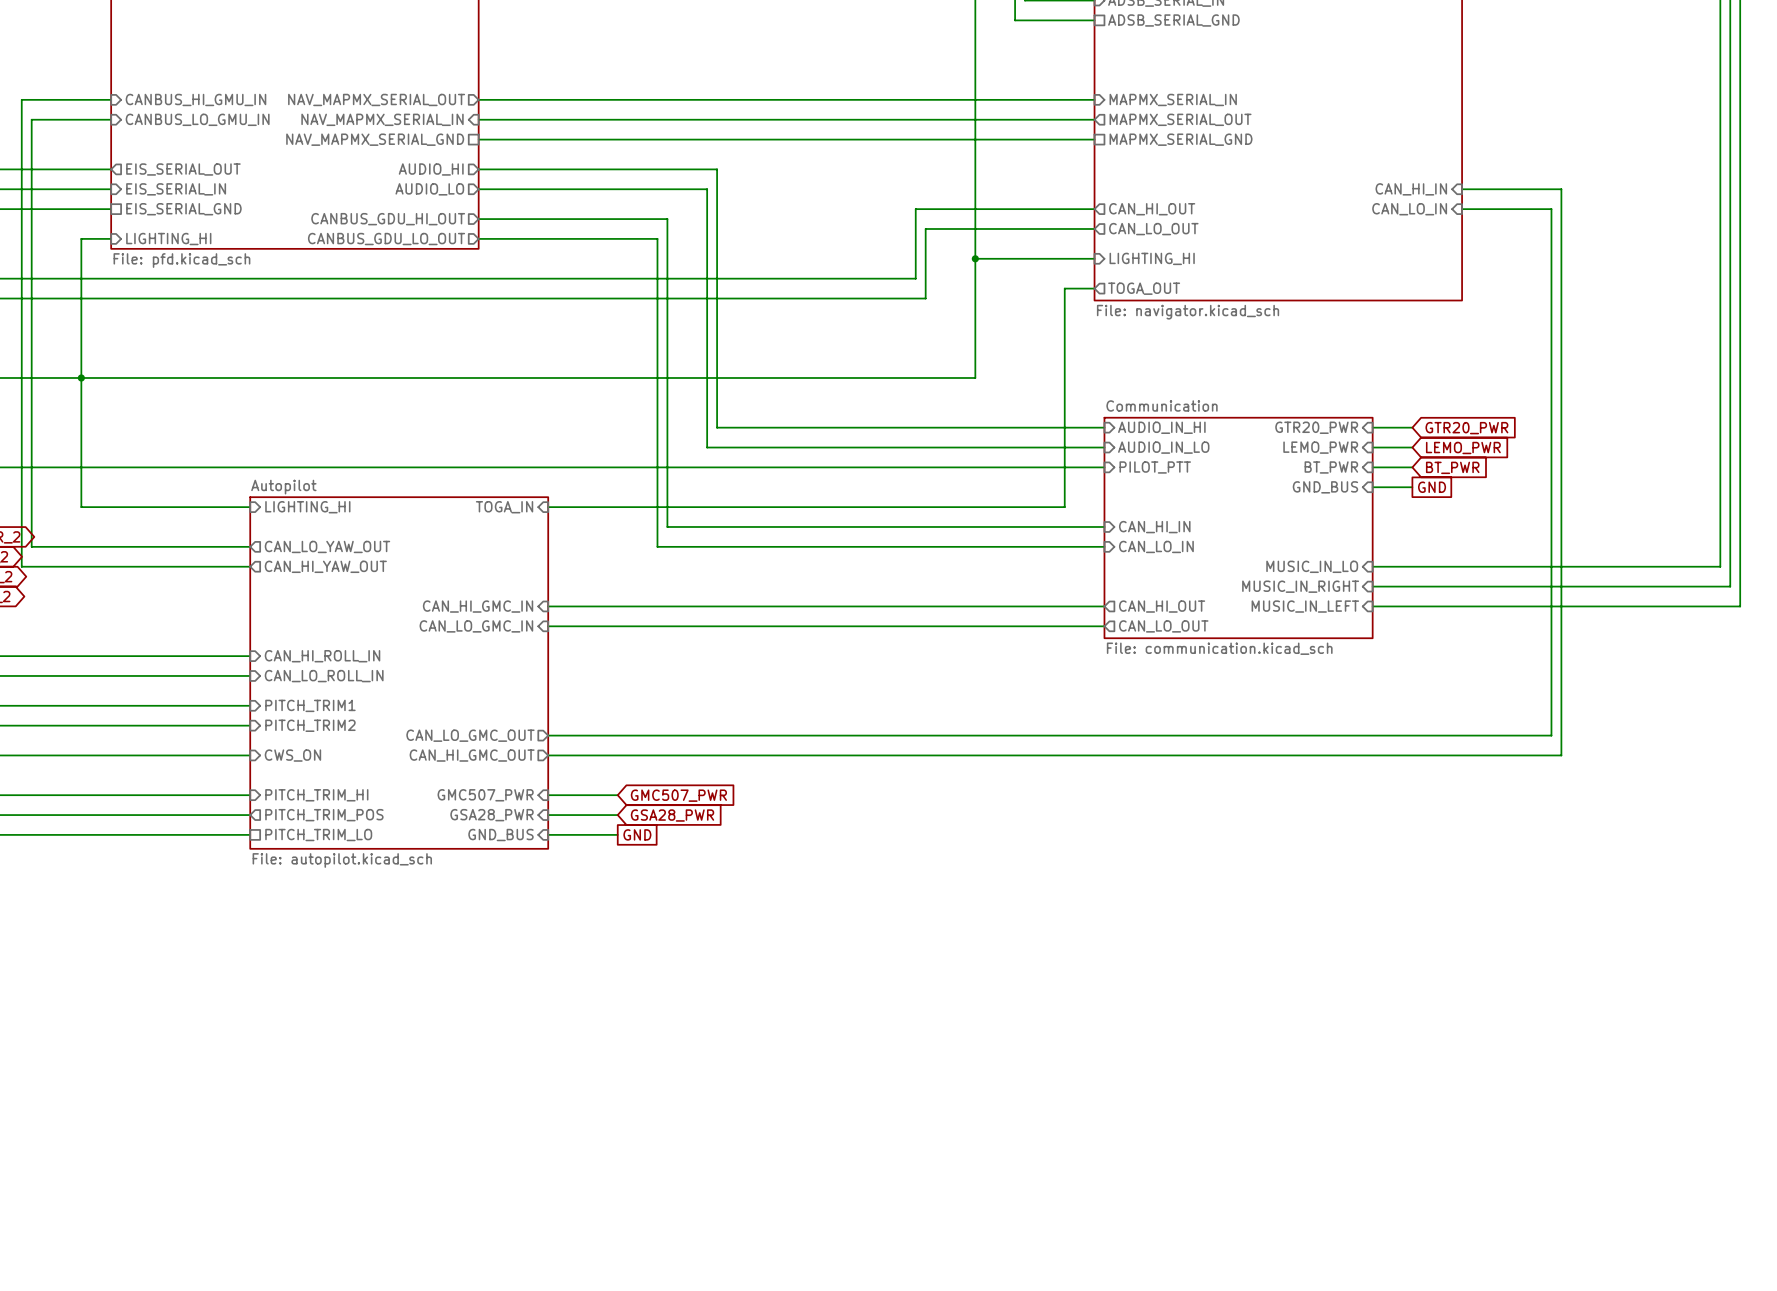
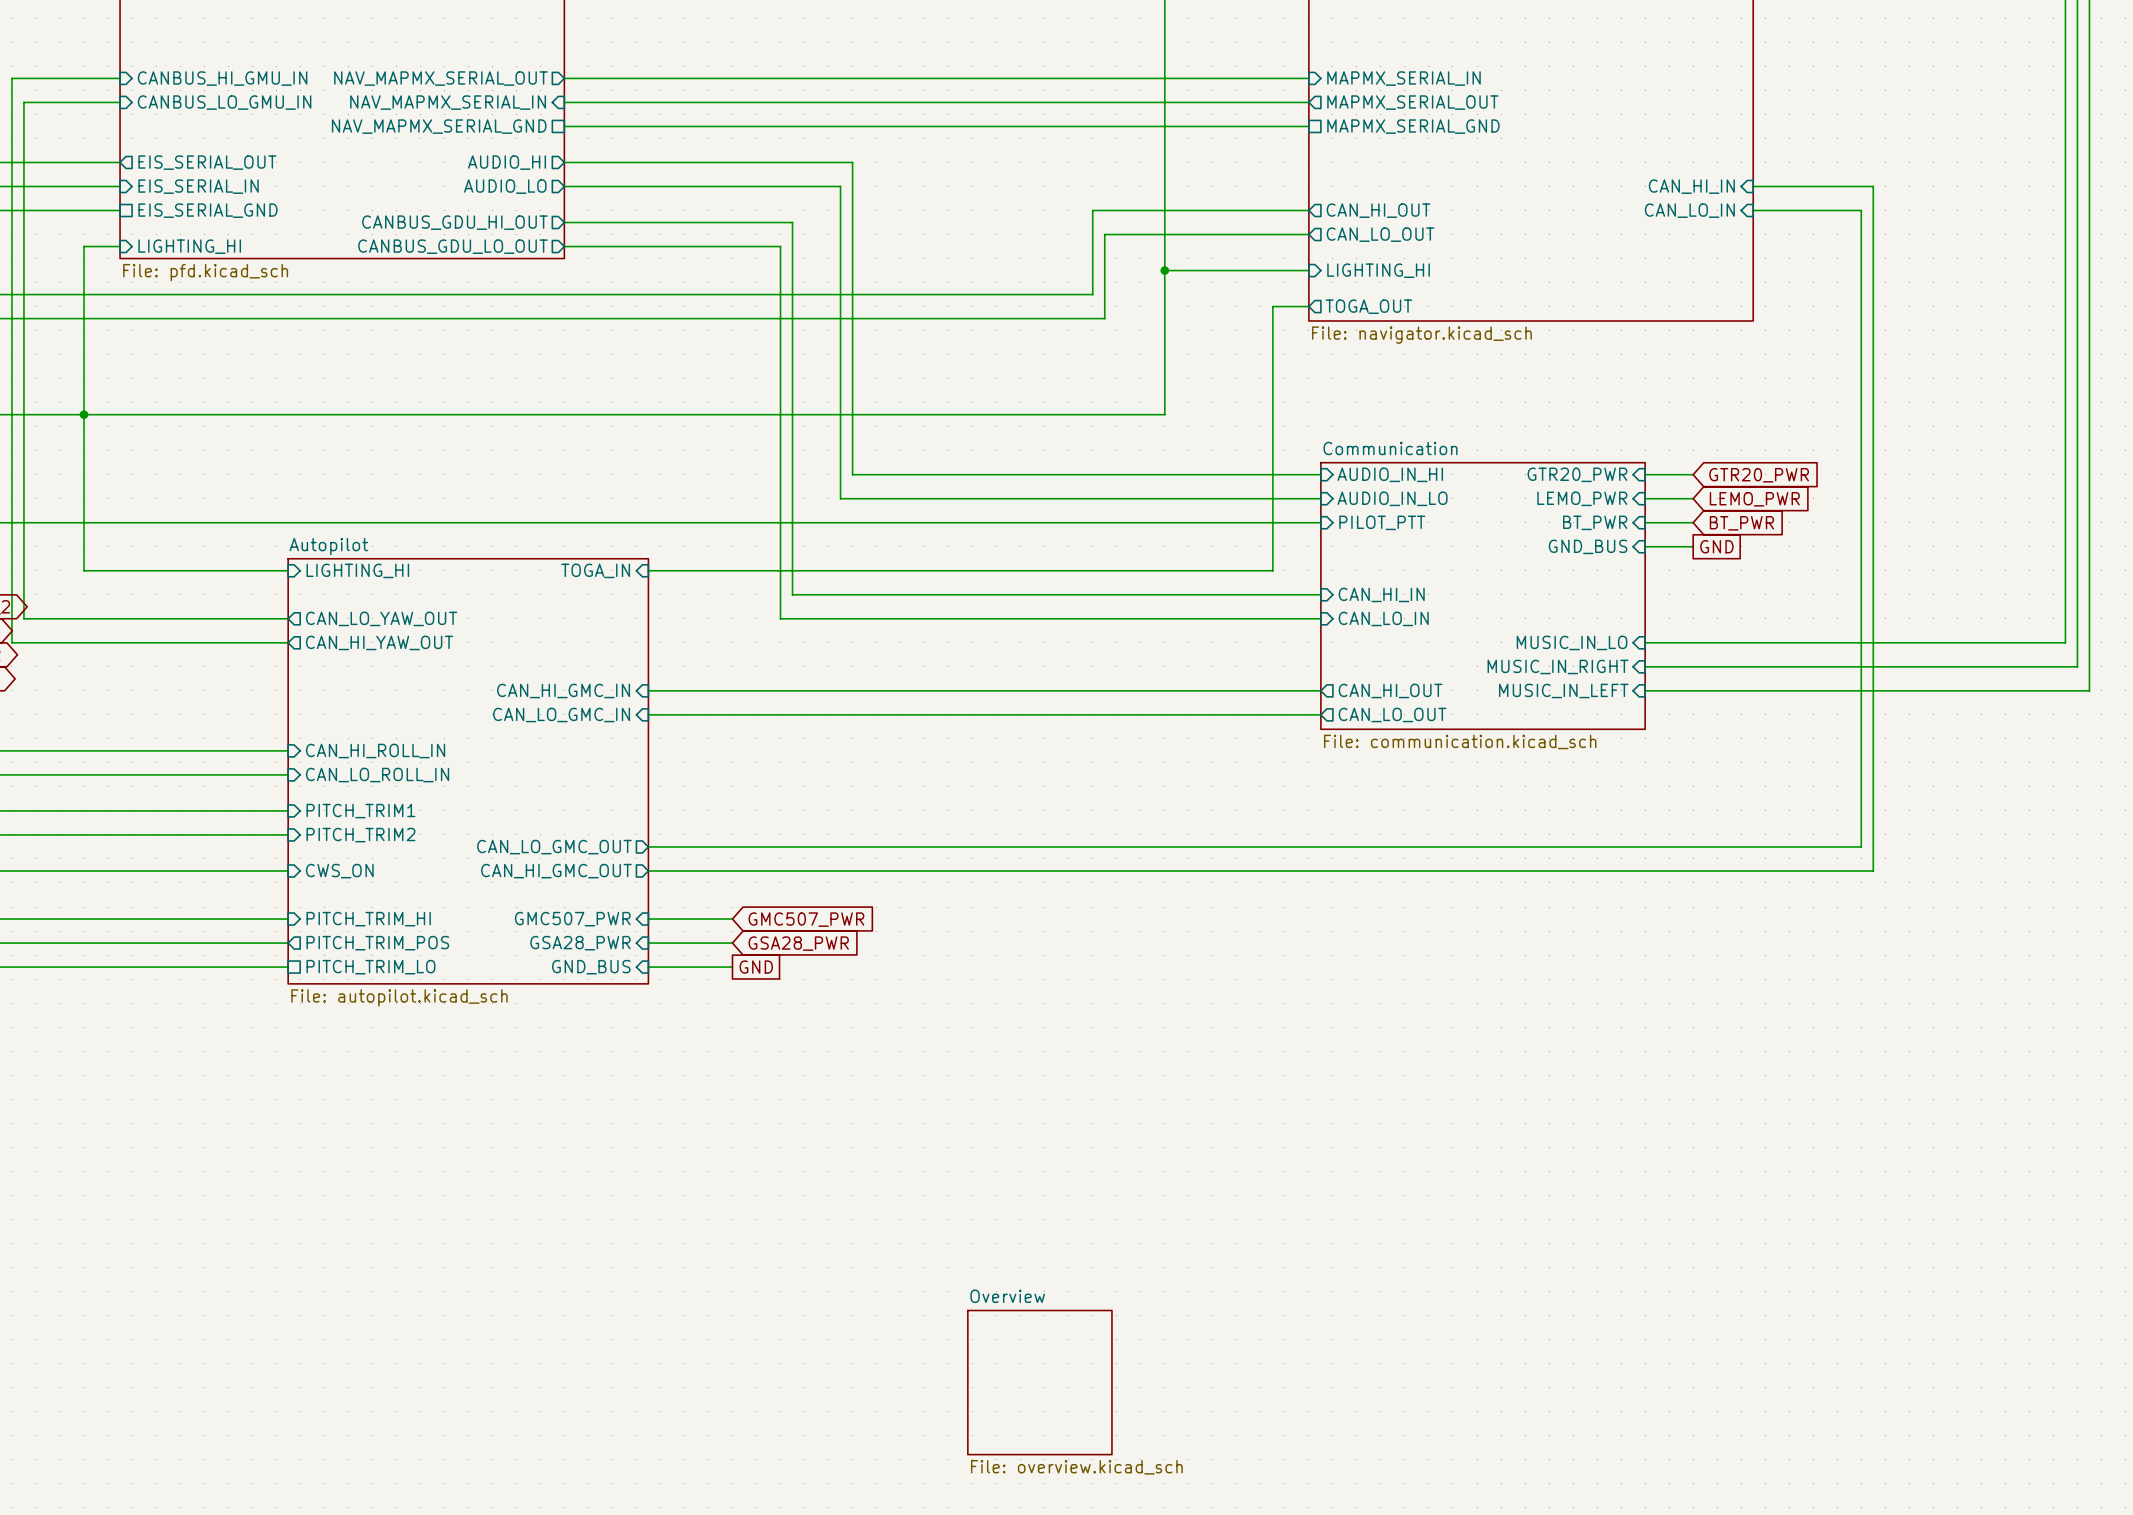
sheet Overview: none -> File: overview.kicad_sch (1039, 1382)

